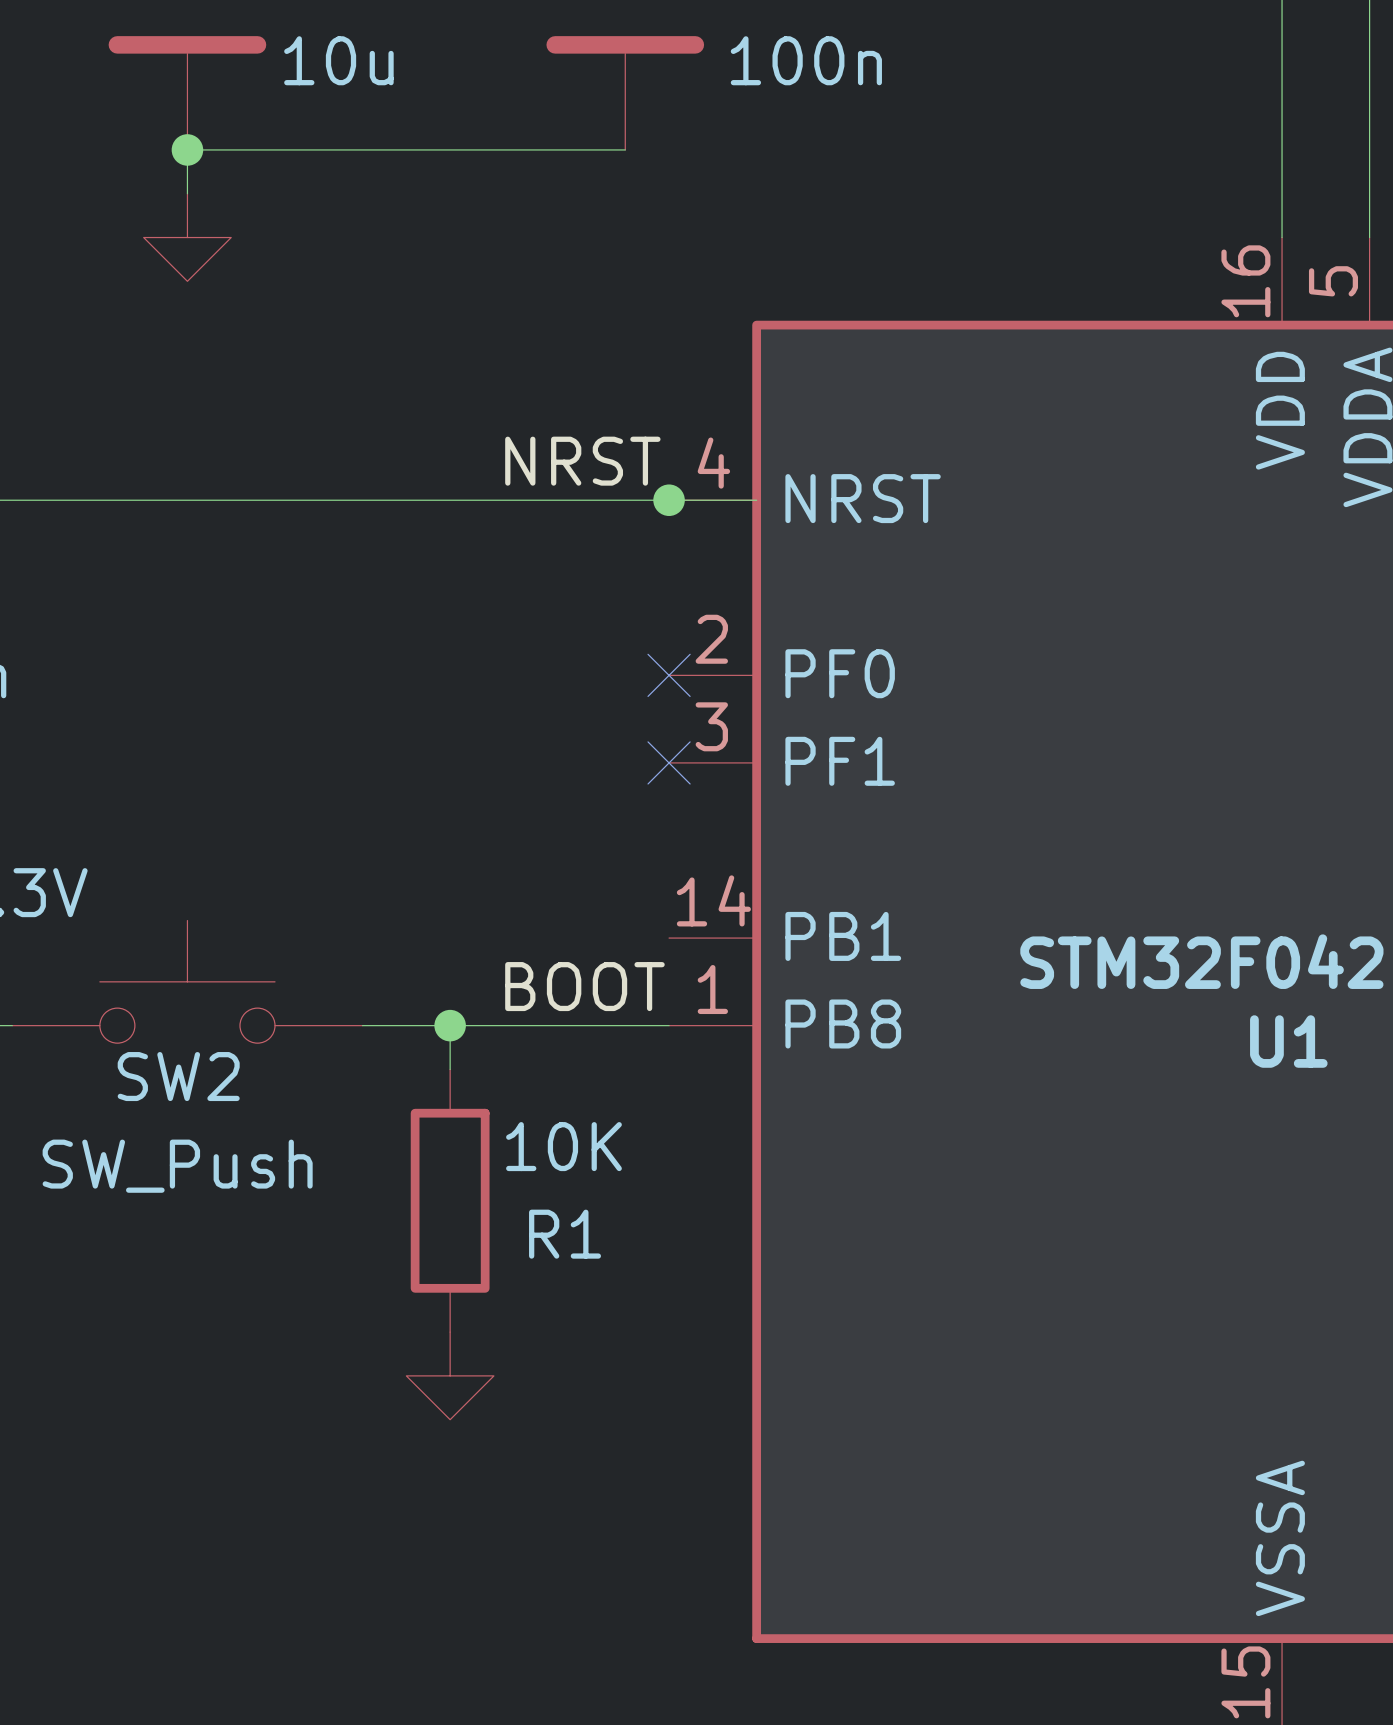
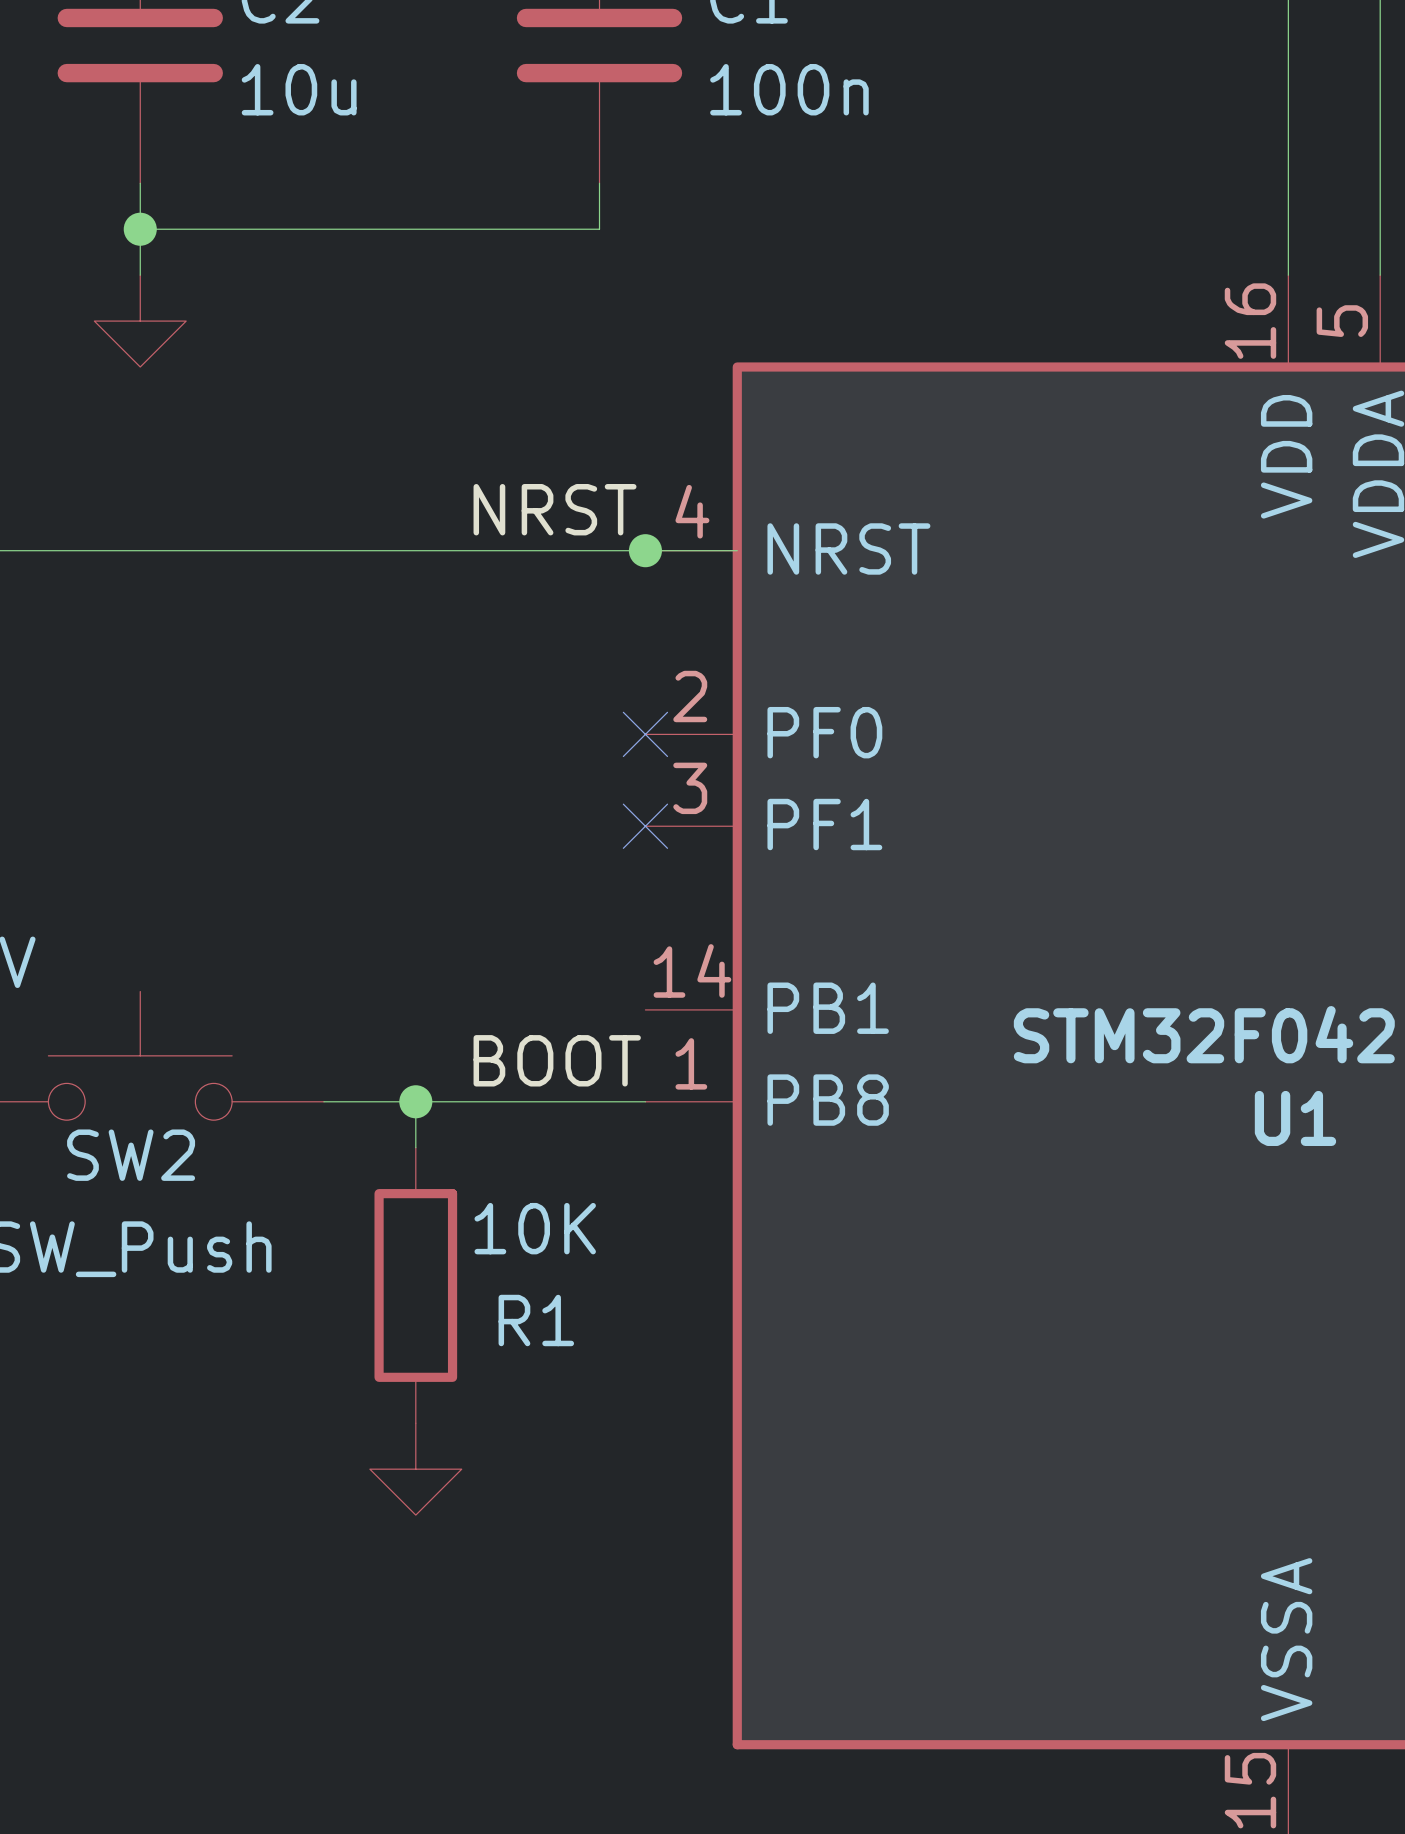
wire: (187, 149) (625, 149) -> (140, 275) (140, 229) (599, 229) (599, 183)
junction position: (187, 149) -> (140, 229)
power symbol position: (187, 237) -> (140, 321)

